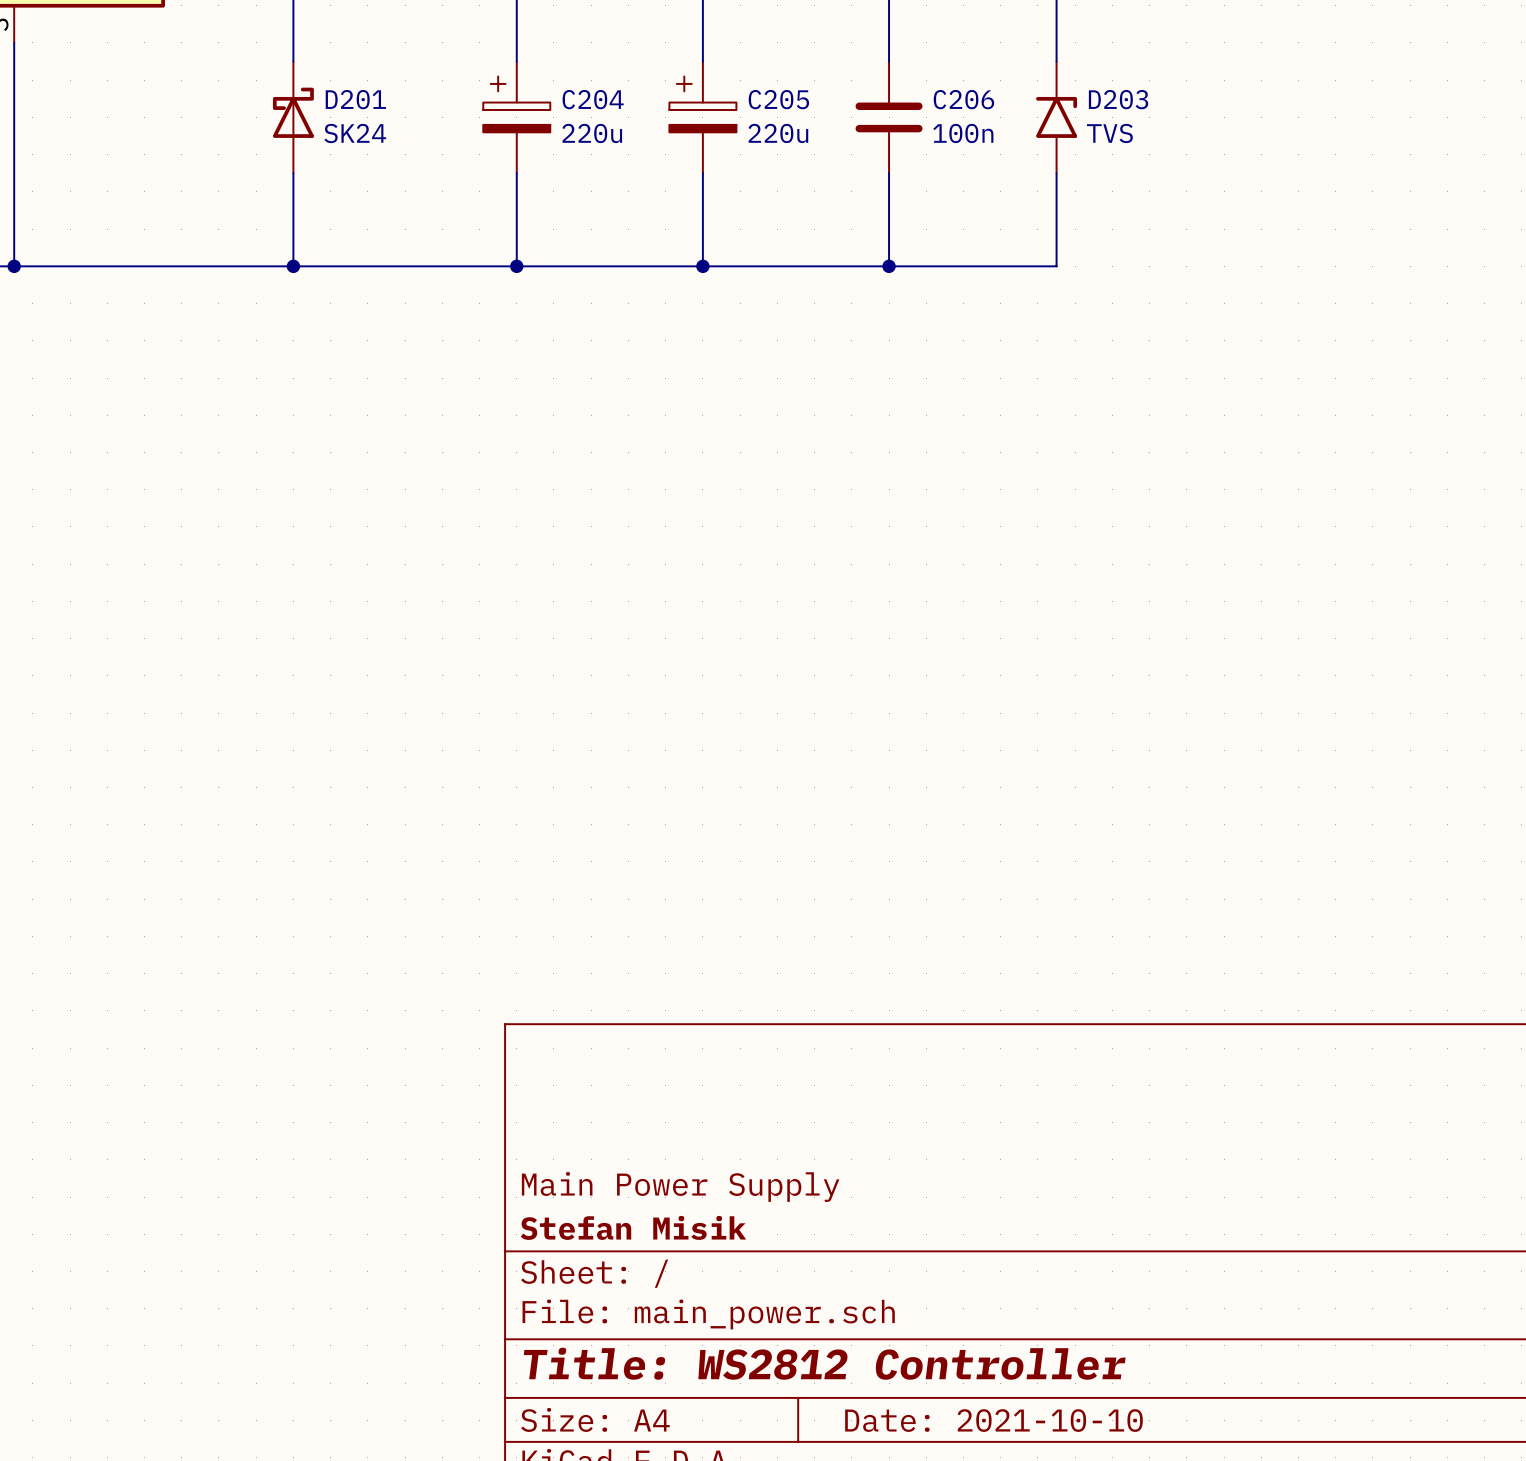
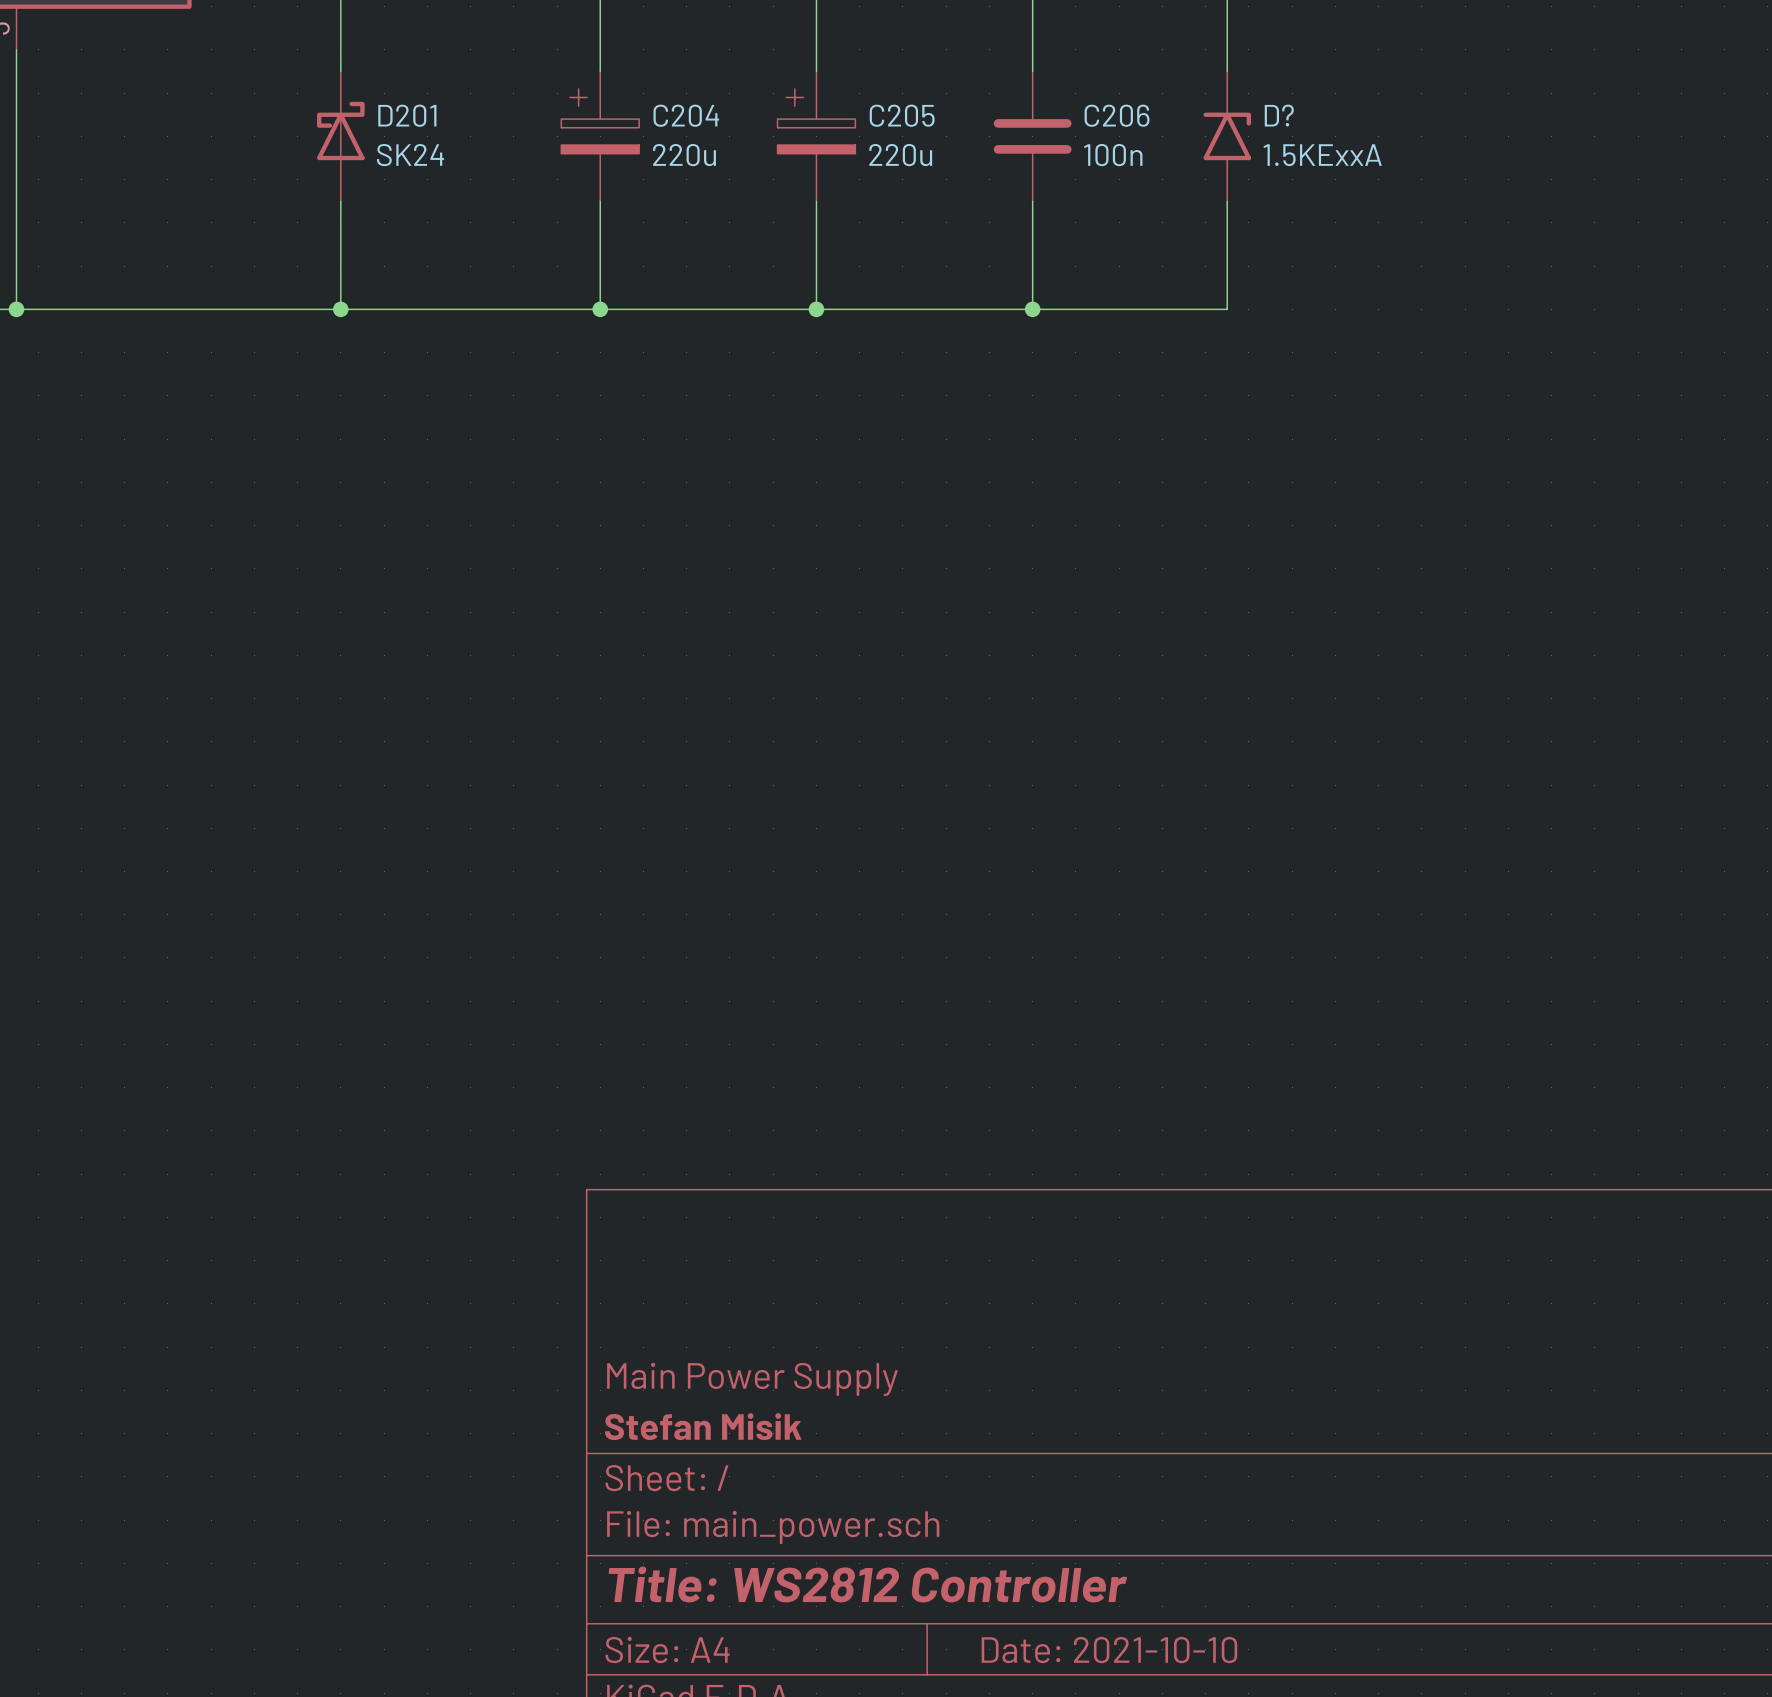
D203 name: D203 (1118, 99) -> D? (1279, 115)
D203 value: TVS (1109, 133) -> 1.5KExxA (1322, 155)

